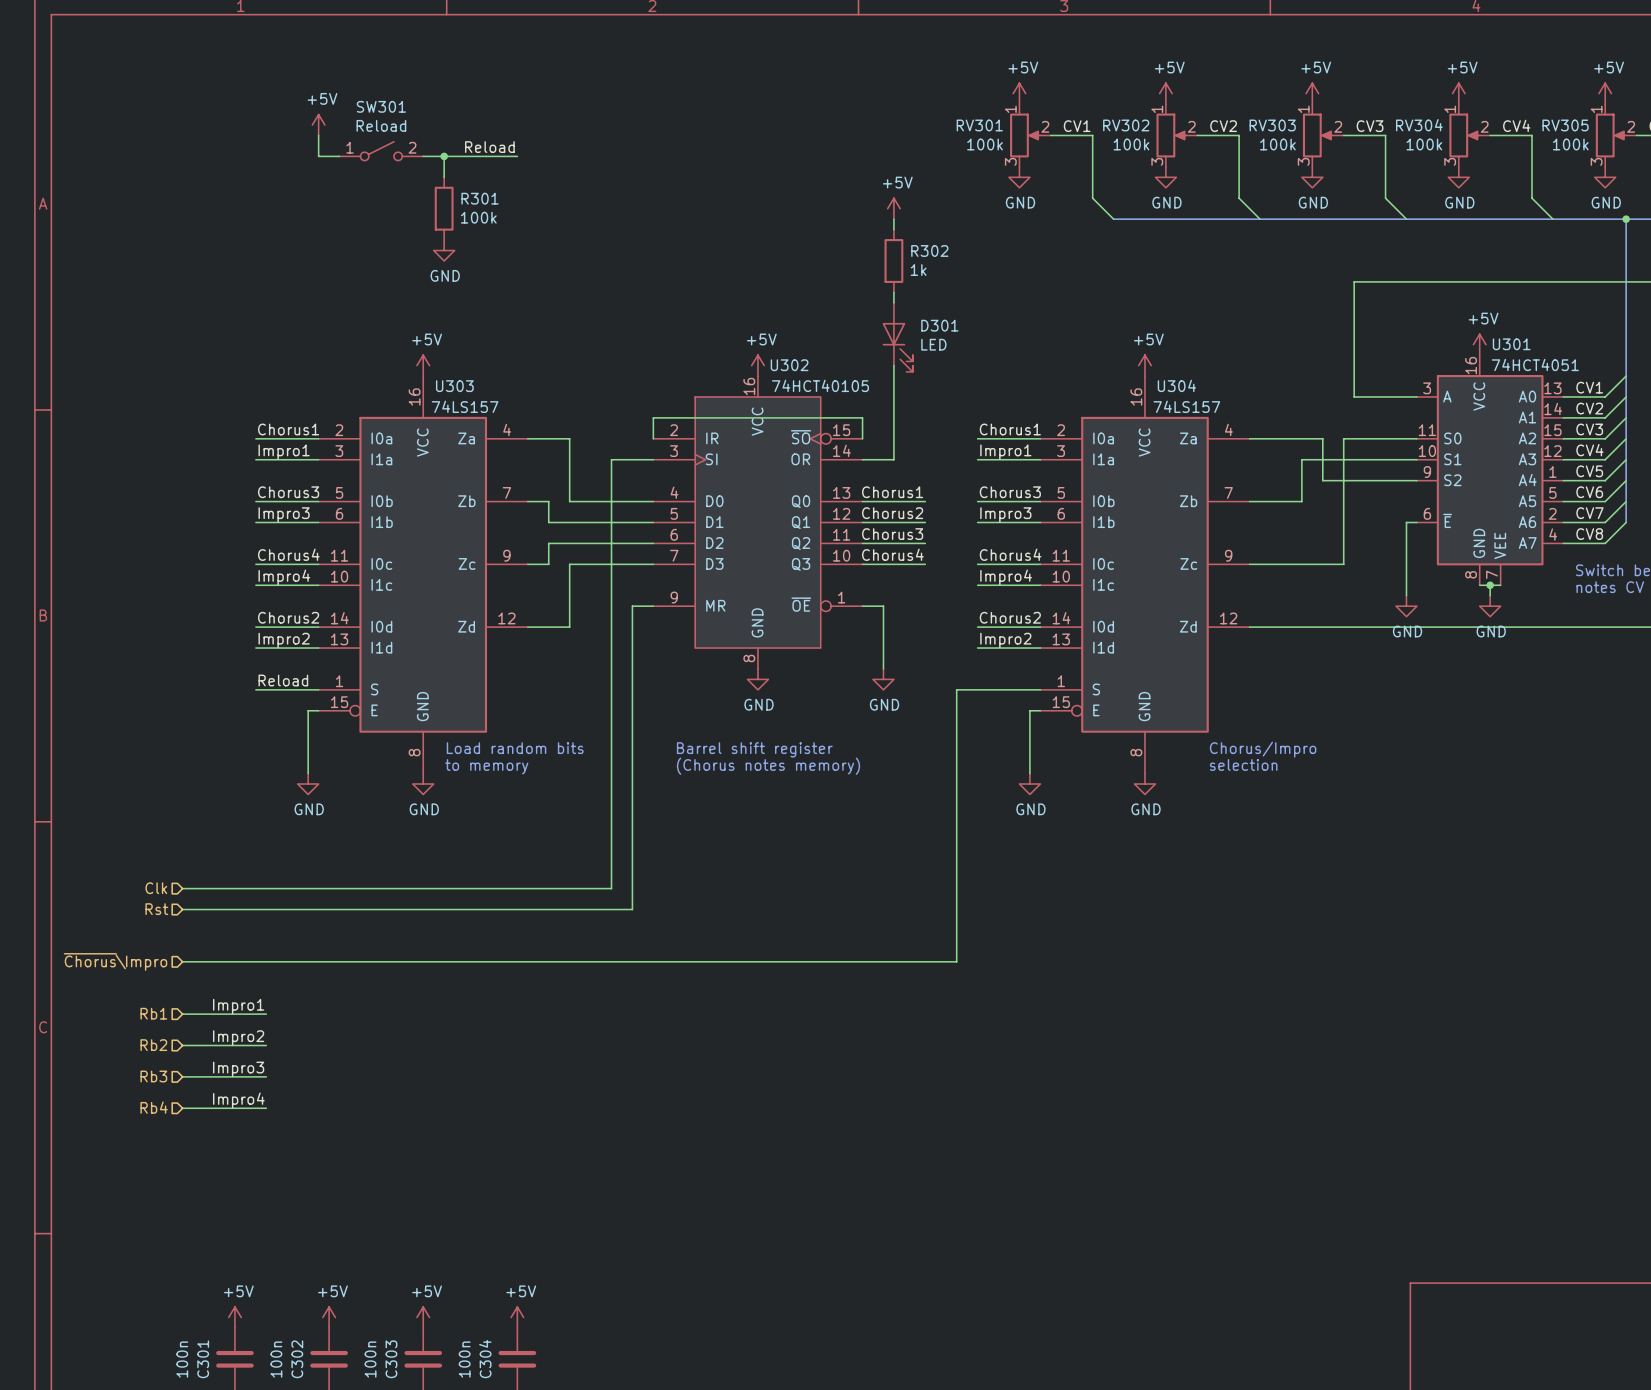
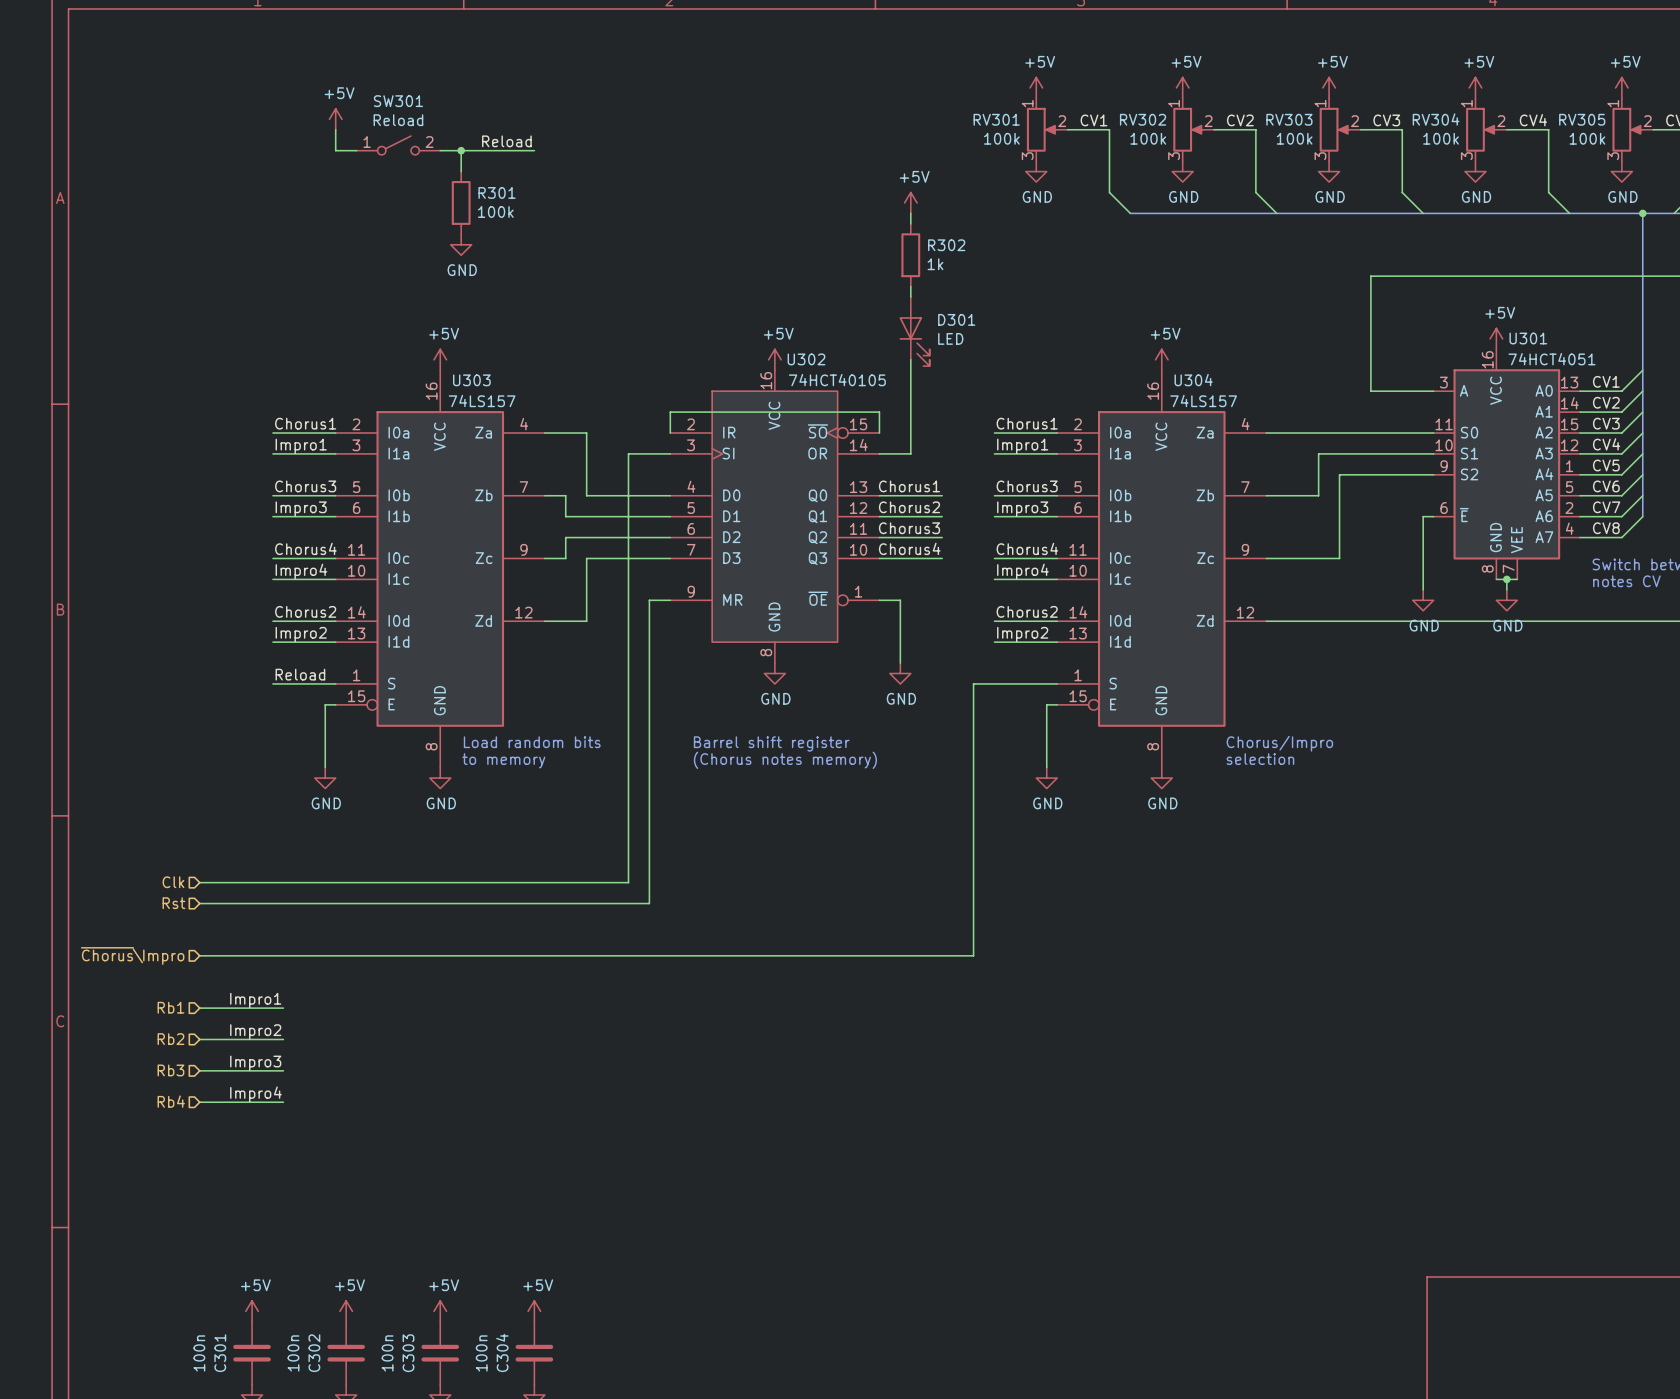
wire: (1322, 438) (1322, 480) -> (1339, 433) (1360, 433)
wire: (1343, 438) (1343, 564) (1322, 564) -> (1339, 474) (1339, 558)

